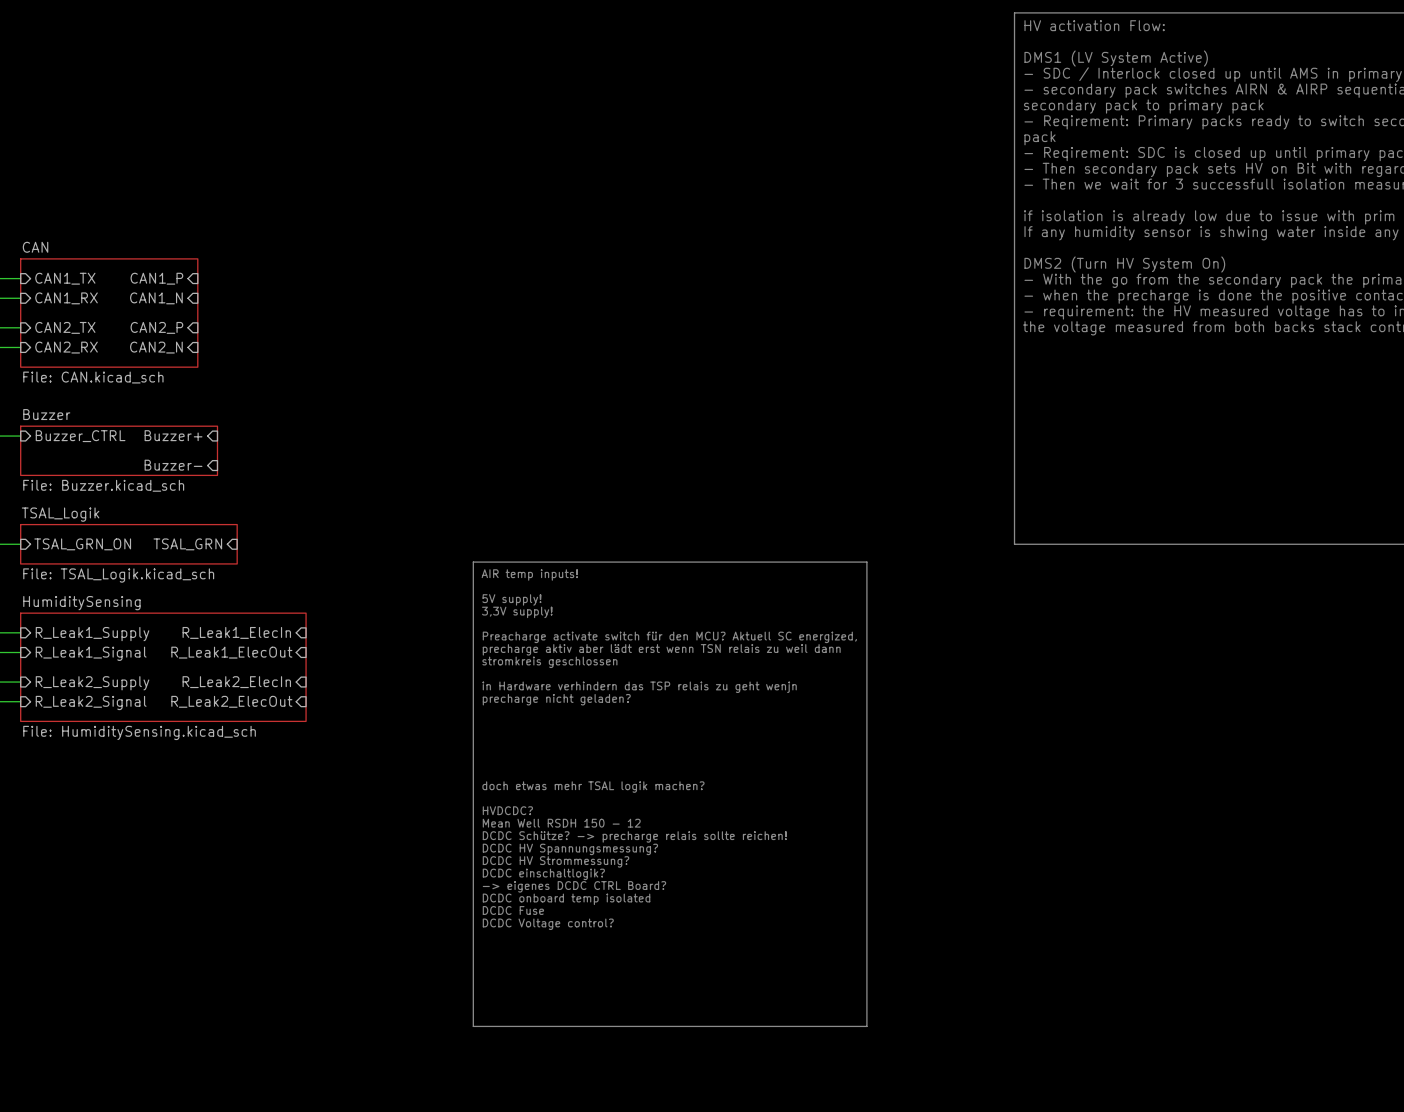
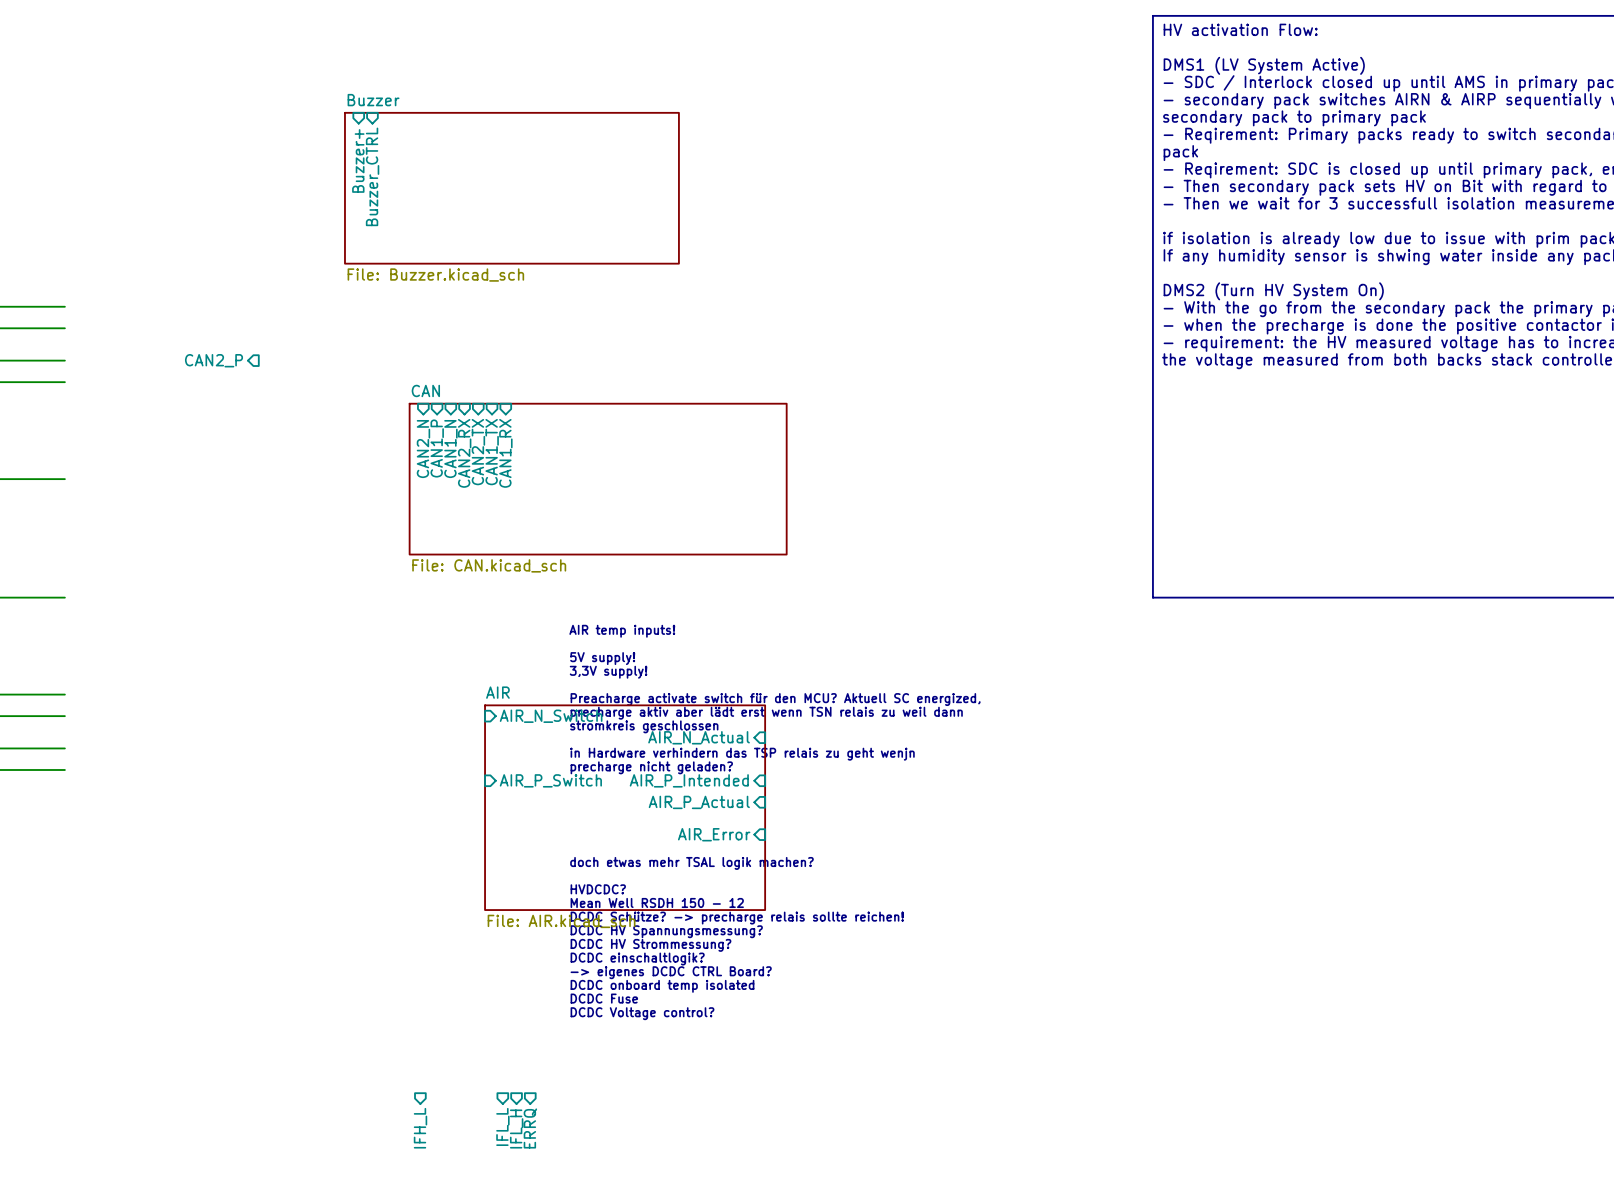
sheet pin: none -> Buzzer+ (358, 160)
sheet pin: none -> Buzzer_CTRL (372, 176)
sheet Buzzer: none -> File: Buzzer.kicad_sch (511, 188)
sheet pin: CAN1_TX (65, 278) -> none
sheet pin: CAN1_P (156, 278) -> none
sheet pin: CAN1_RX (66, 298) -> none
sheet pin: CAN1_N (156, 298) -> none
sheet CAN: File: CAN.kicad_sch (109, 313) -> none
sheet pin: CAN2_TX (65, 327) -> none
sheet pin: CAN2_RX (66, 347) -> none
sheet pin rotation: 0° (156, 347) -> 90° counterclockwise (423, 449)
sheet pin position: CAN2_N (156, 347) -> CAN2_N (423, 449)
sheet pin: none -> CAN1_P (437, 448)
sheet pin: none -> CAN1_N (450, 449)
sheet pin: none -> CAN2_TX (478, 452)
sheet pin: none -> CAN1_TX (492, 452)
sheet pin: none -> CAN2_RX (464, 453)
sheet pin: none -> CAN1_RX (505, 453)
sheet pin: Buzzer+ (173, 435) -> none
sheet pin: Buzzer_CTRL (80, 436) -> none
sheet CAN: none -> File: CAN.kicad_sch (598, 479)
sheet Buzzer: File: Buzzer.kicad_sch (119, 450) -> none
sheet pin: Buzzer- (173, 465) -> none
sheet pin: TSAL_GRN_ON (82, 544) -> none
sheet TSAL_Logik: File: TSAL_Logik.kicad_sch (128, 544) -> none
sheet pin: TSAL_GRN (187, 544) -> none
line: (473, 562) (866, 562) (866, 1026) (473, 1026) (473, 562) -> none
sheet pin: R_Leak1_ElecIn (236, 632) -> none
sheet pin: R_Leak1_Supply (92, 634) -> none
sheet pin: R_Leak1_ElecOut (231, 652) -> none
sheet pin: none -> AIR_N_Switch (551, 716)
sheet pin: R_Leak1_Signal (91, 653) -> none
sheet HumiditySensing: File: HumiditySensing.kicad_sch (163, 667) -> none
sheet pin: none -> AIR_N_Actual (699, 737)
sheet pin: R_Leak2_ElecIn (236, 682) -> none
sheet pin: R_Leak2_Supply (92, 683) -> none
sheet pin: R_Leak2_ElecOut (231, 701) -> none
sheet pin: R_Leak2_Signal (91, 702) -> none
sheet pin: none -> AIR_P_Switch (550, 780)
sheet pin: none -> AIR_P_Intended (689, 780)
sheet pin: none -> AIR_P_Actual (699, 802)
sheet AIR: none -> File: AIR.kicad_sch (625, 807)
sheet pin: none -> AIR_Error (714, 834)
sheet pin: none -> IFL_L (502, 1126)
sheet pin: none -> IFH_L (420, 1128)
sheet pin: none -> IFL_H (516, 1129)
sheet pin: none -> ERRQ (530, 1128)

